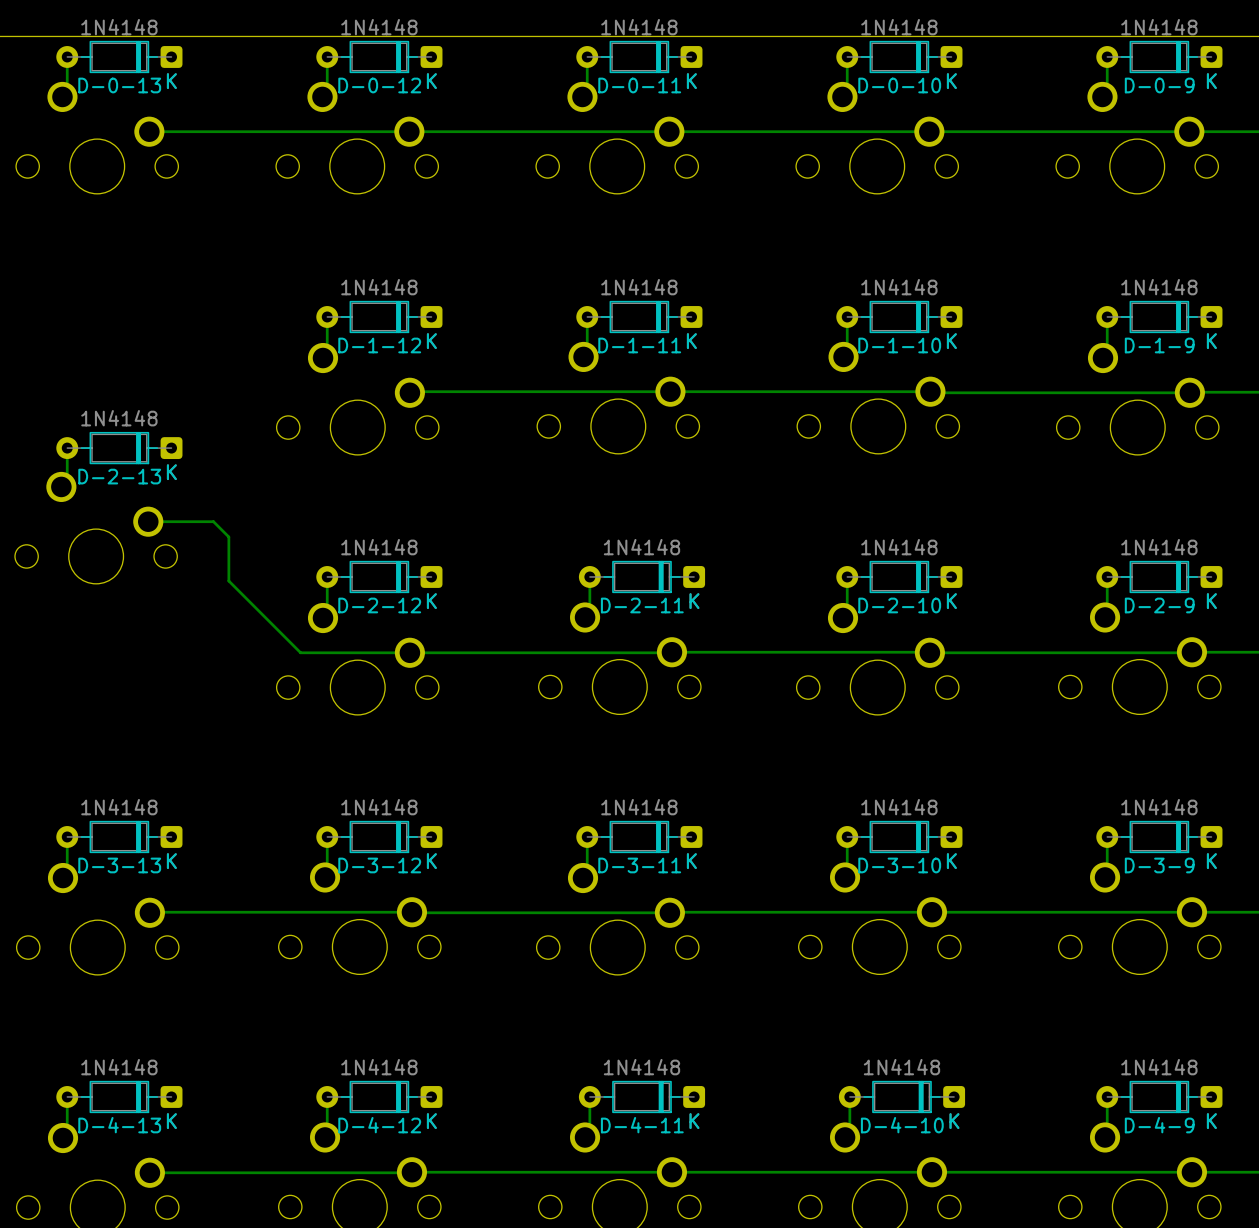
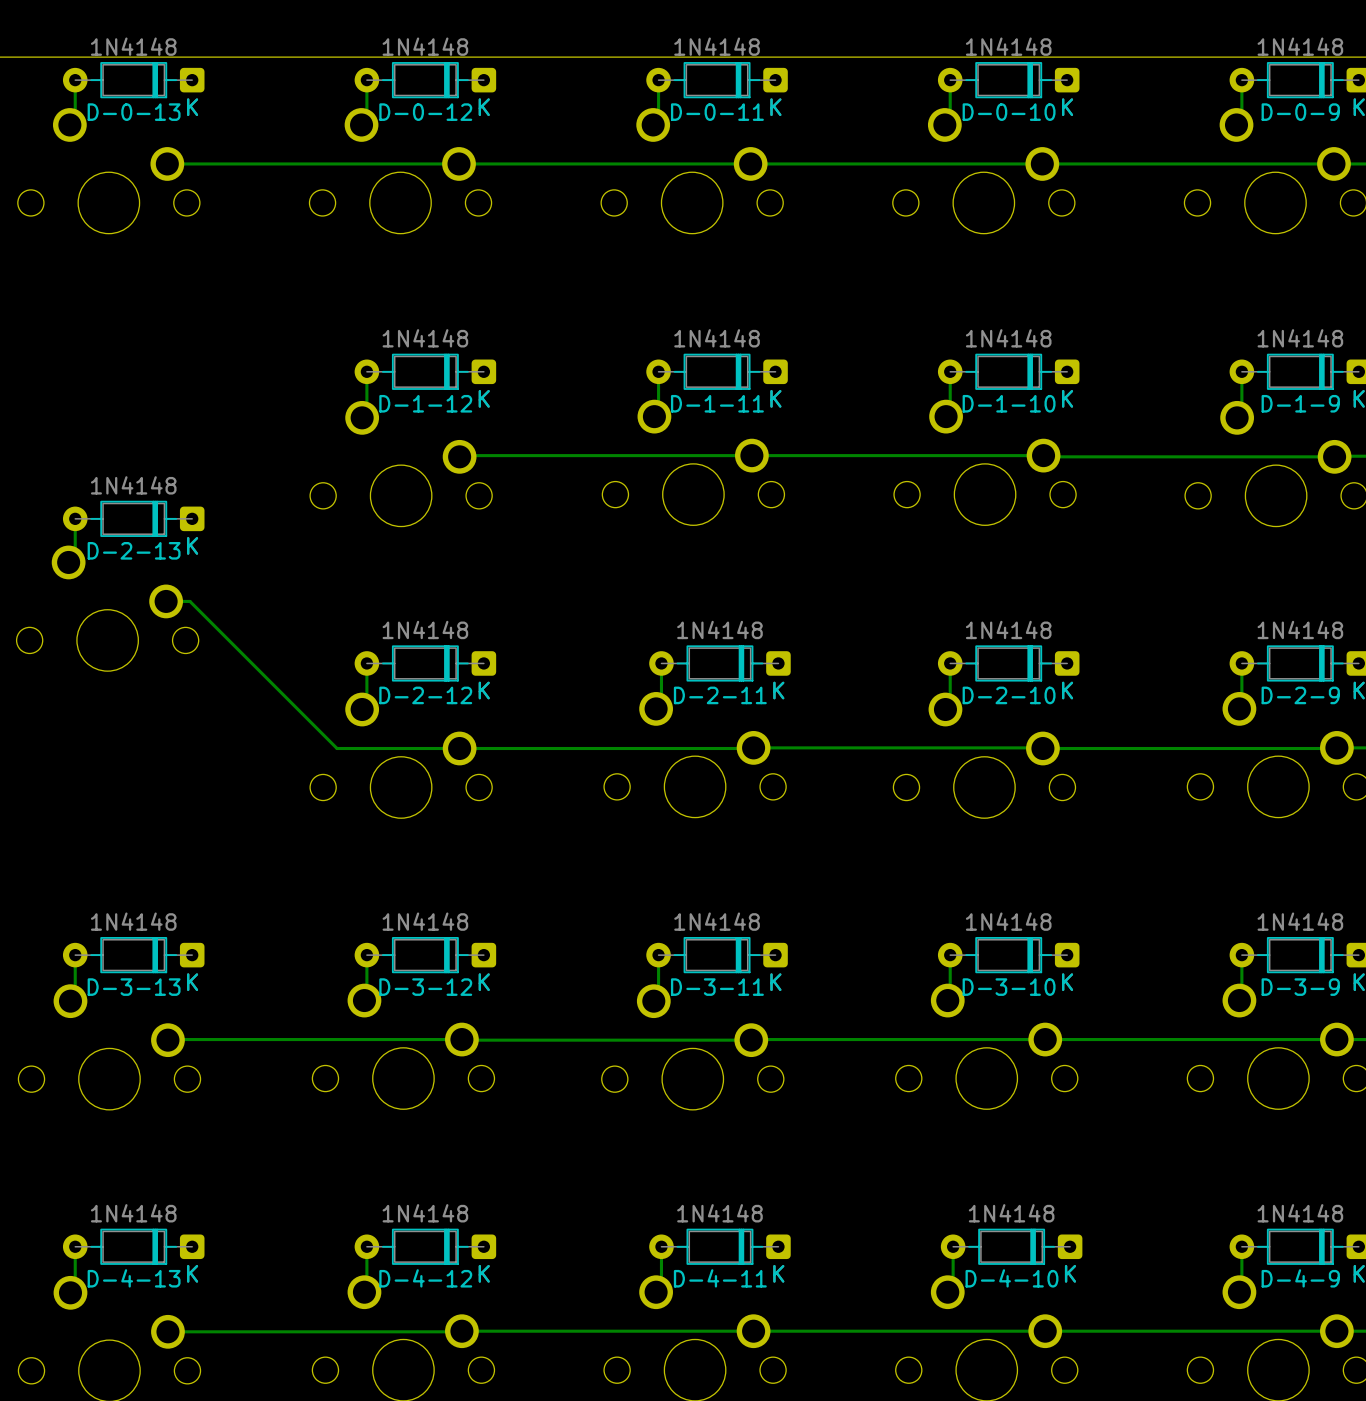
track: (169, 521) (213, 521) (228, 537) (228, 581) -> (190, 601) (256, 667)

